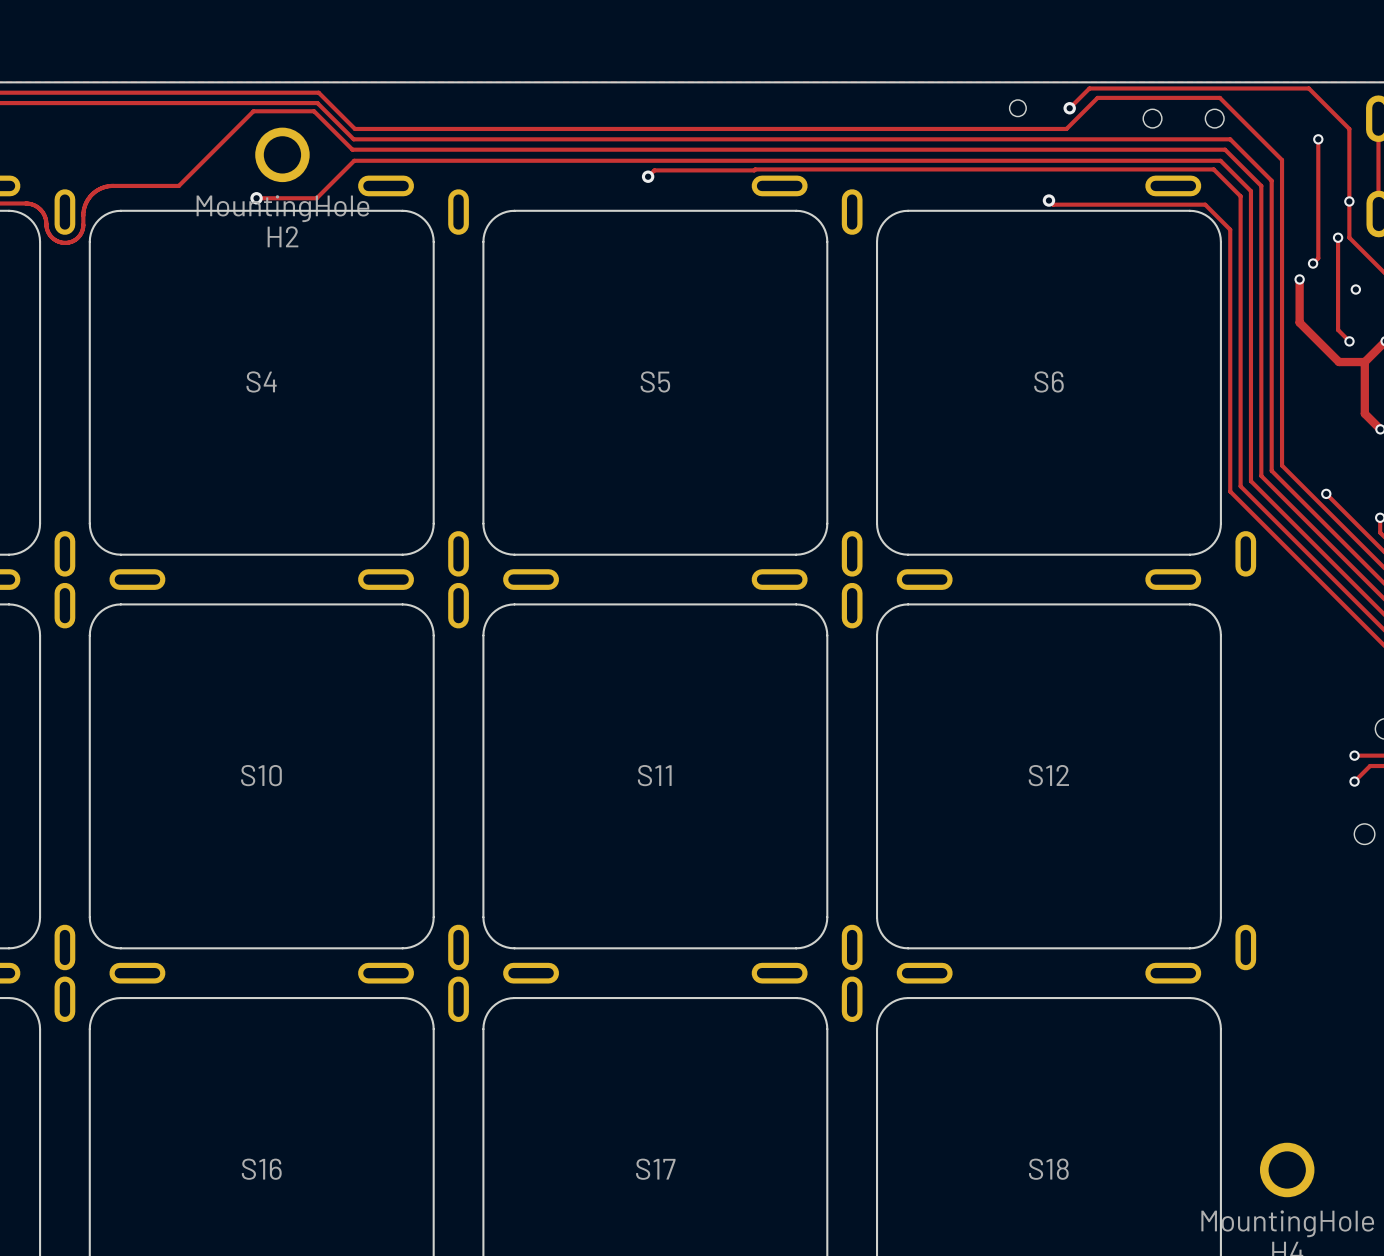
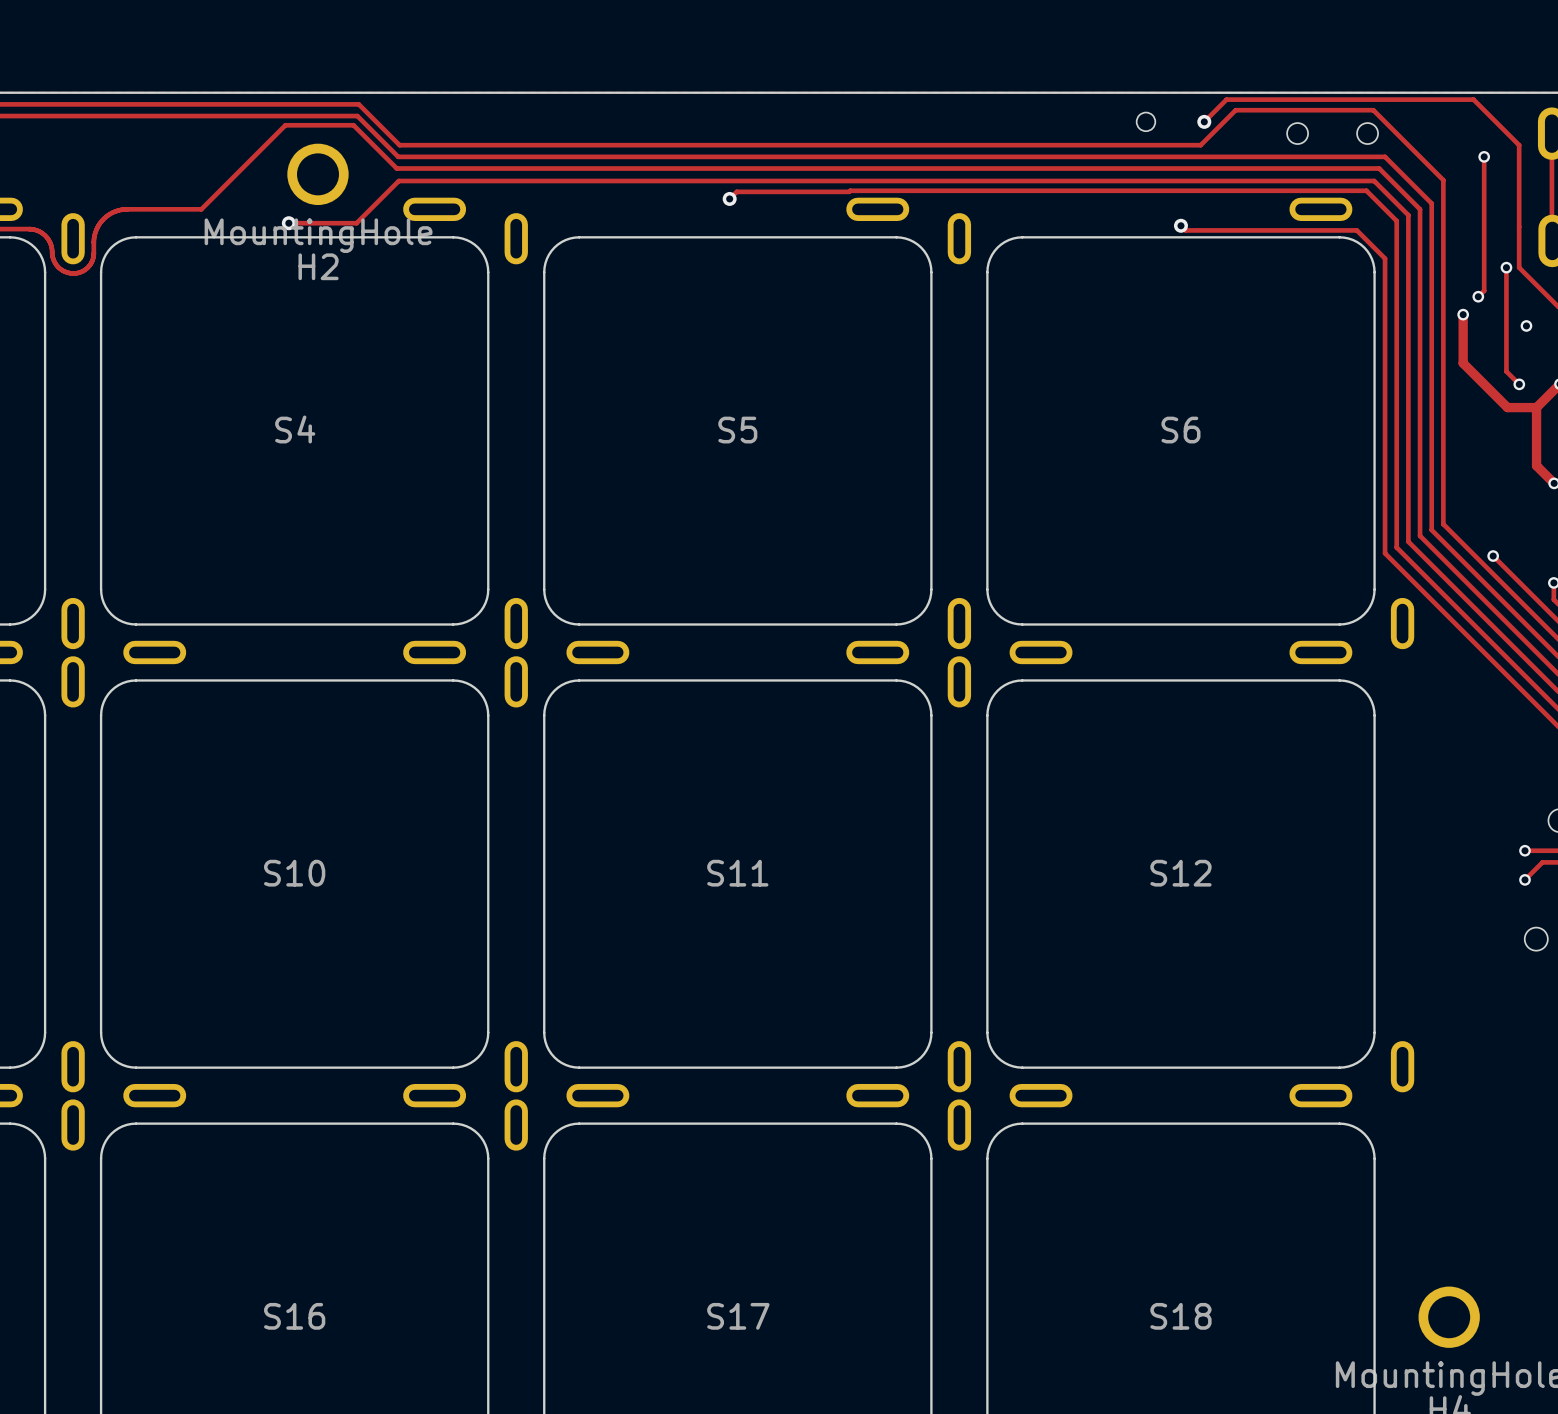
via: (1349, 201) -> none

